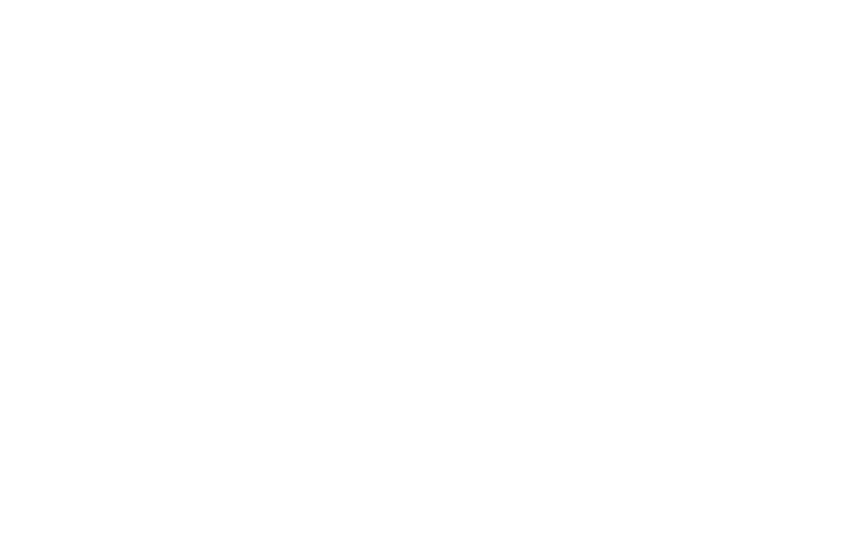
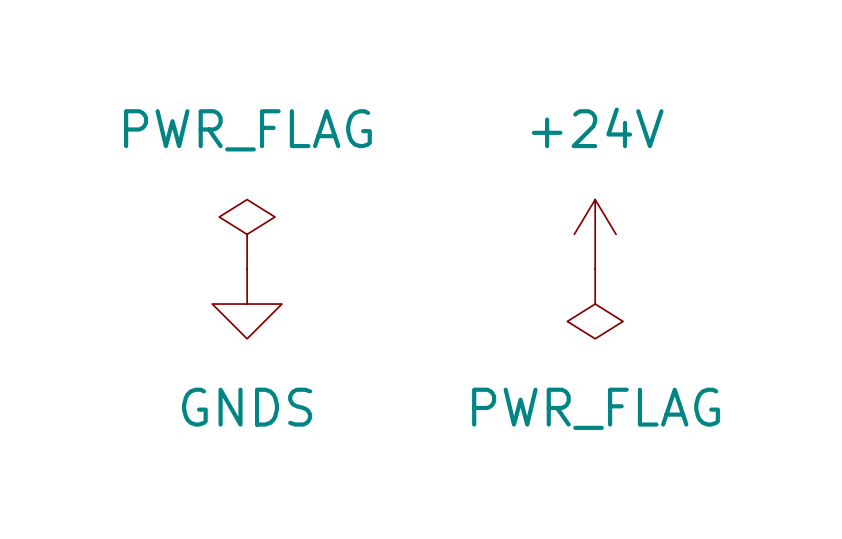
power symbol: none -> PWR_FLAG (247, 234)
power symbol: none -> +24V (595, 234)
power symbol: none -> GNDS (247, 304)
power symbol: none -> PWR_FLAG (595, 304)

